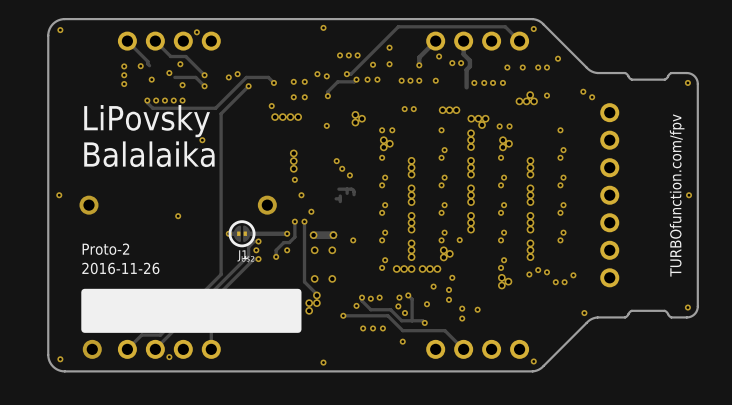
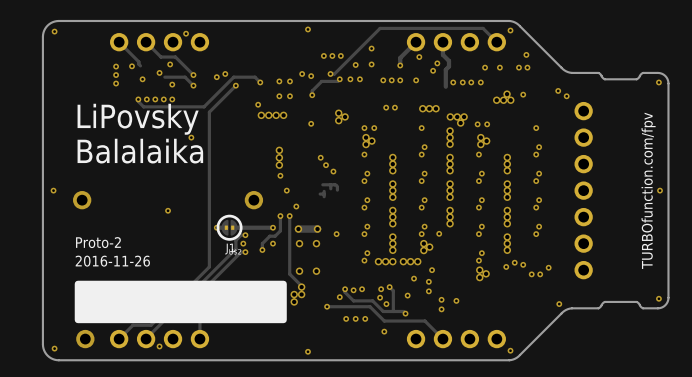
via: none -> (526, 54)
via: (558, 58) -> none
via: (452, 63) -> none
via: none -> (437, 63)
via: (461, 63) -> none
via: (538, 67) -> none
via: none -> (518, 67)
via: (546, 67) -> none
via: none -> (527, 67)
via: none -> (433, 70)

